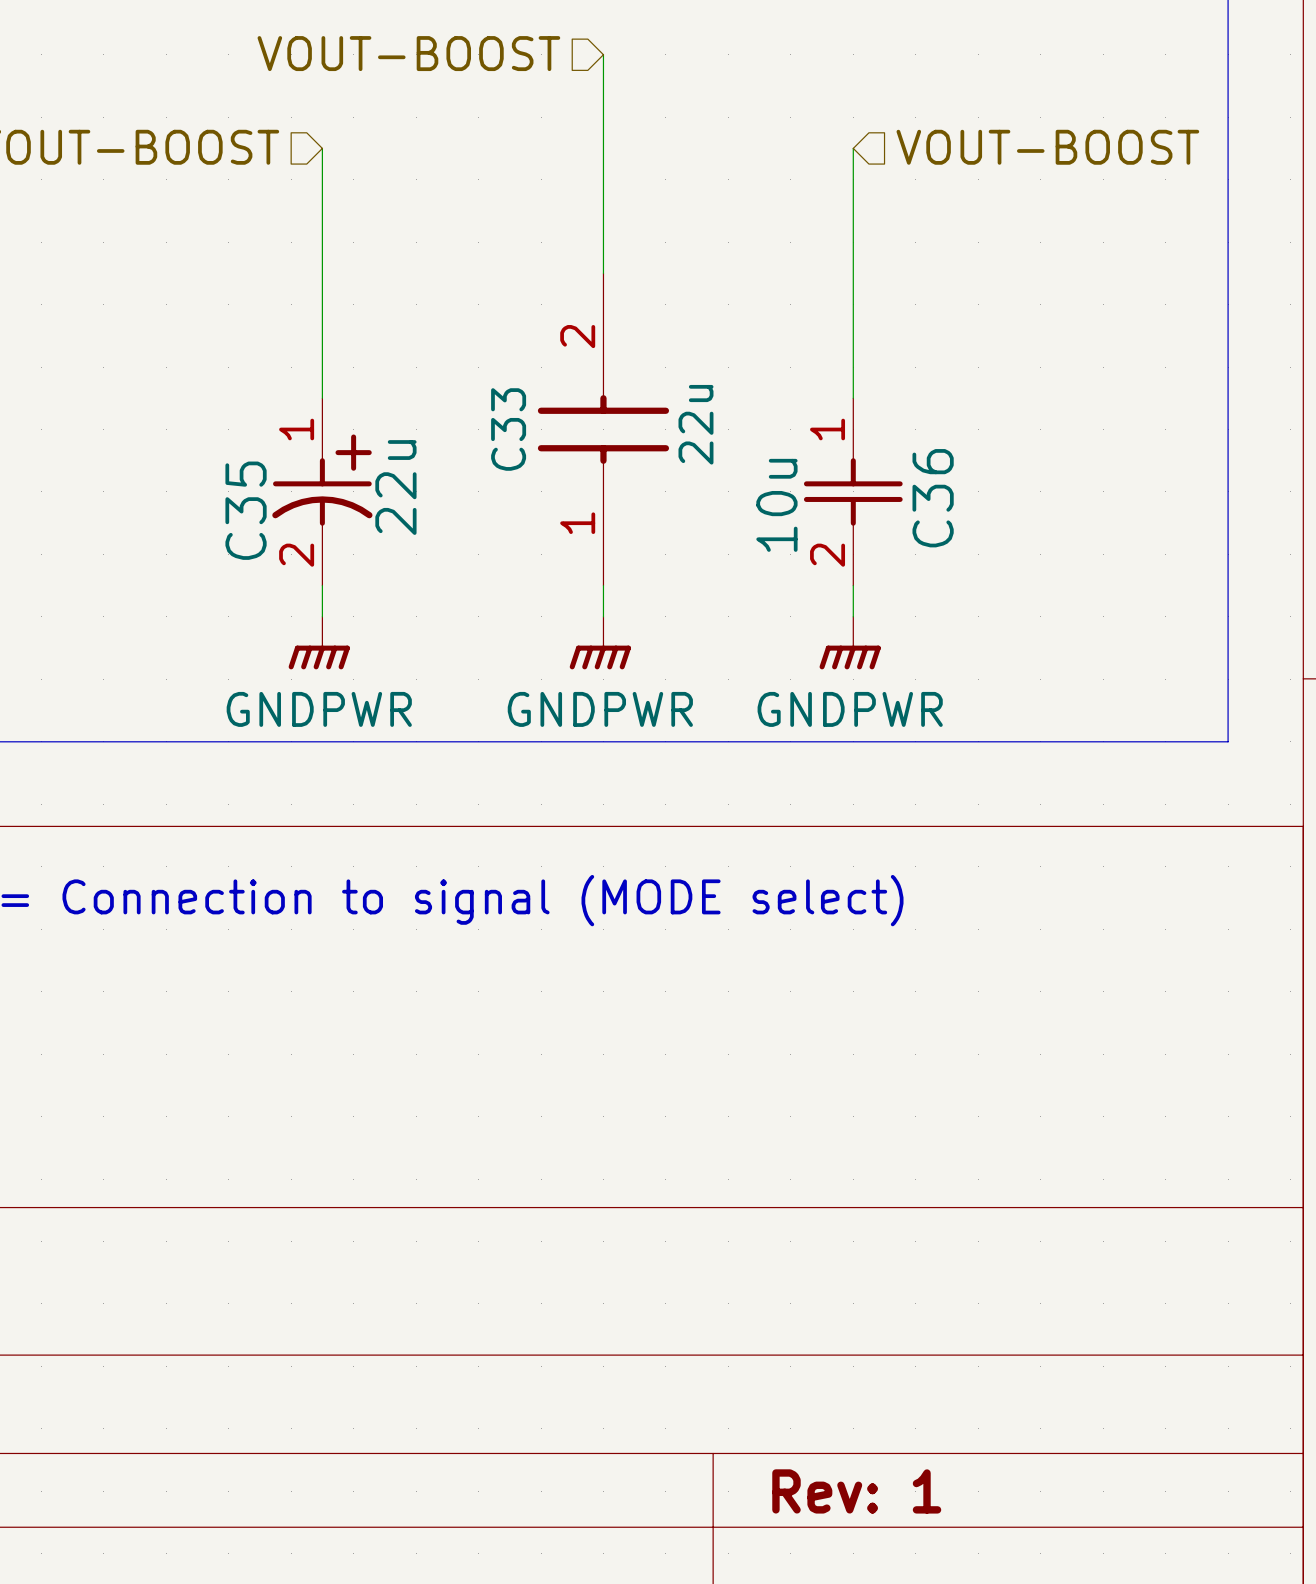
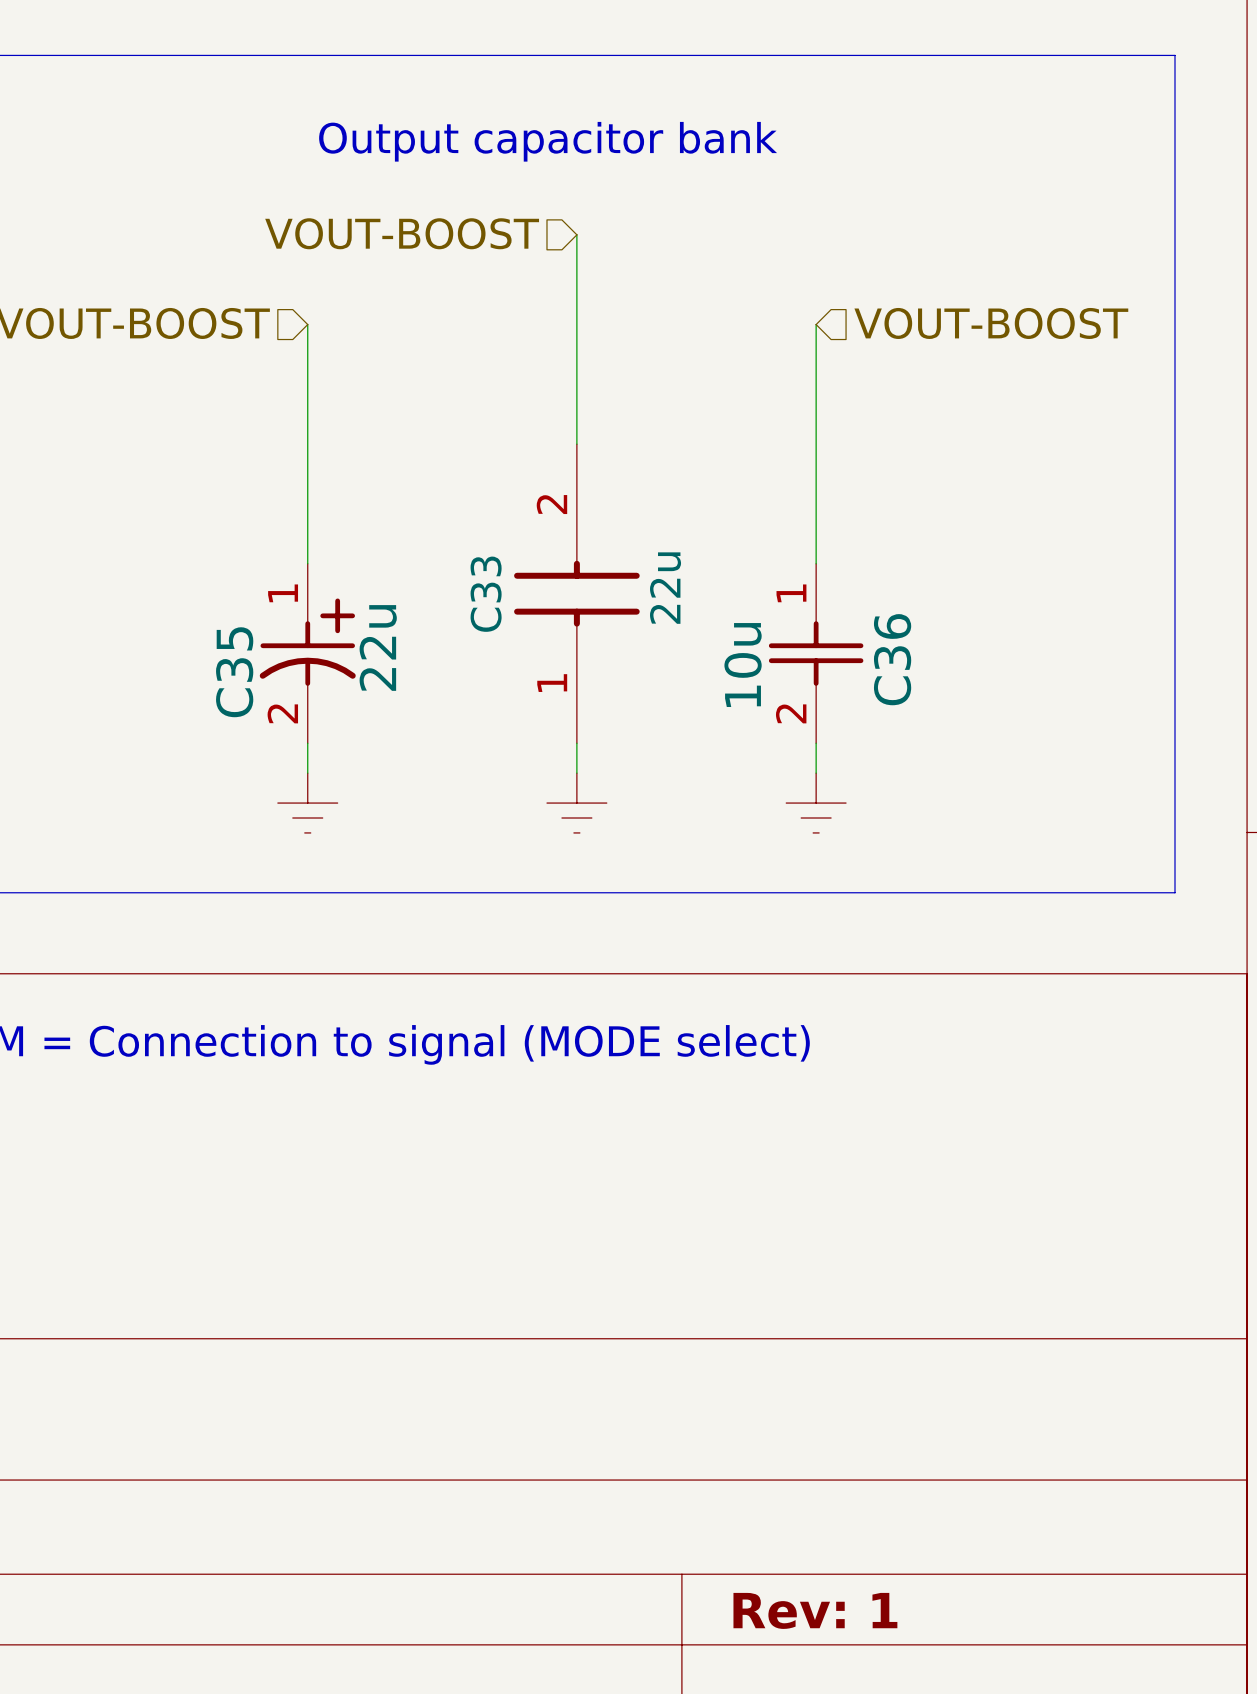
power symbol shape: [288, 616, 350, 670] -> [277, 773, 338, 833]
power symbol shape: [569, 616, 631, 670] -> [546, 773, 607, 833]
power symbol shape: [819, 616, 881, 670] -> [786, 773, 847, 833]
power symbol text: GNDPWR (319, 709) -> none
power symbol text: GNDPWR (600, 709) -> none
power symbol text: GNDPWR (850, 709) -> none

